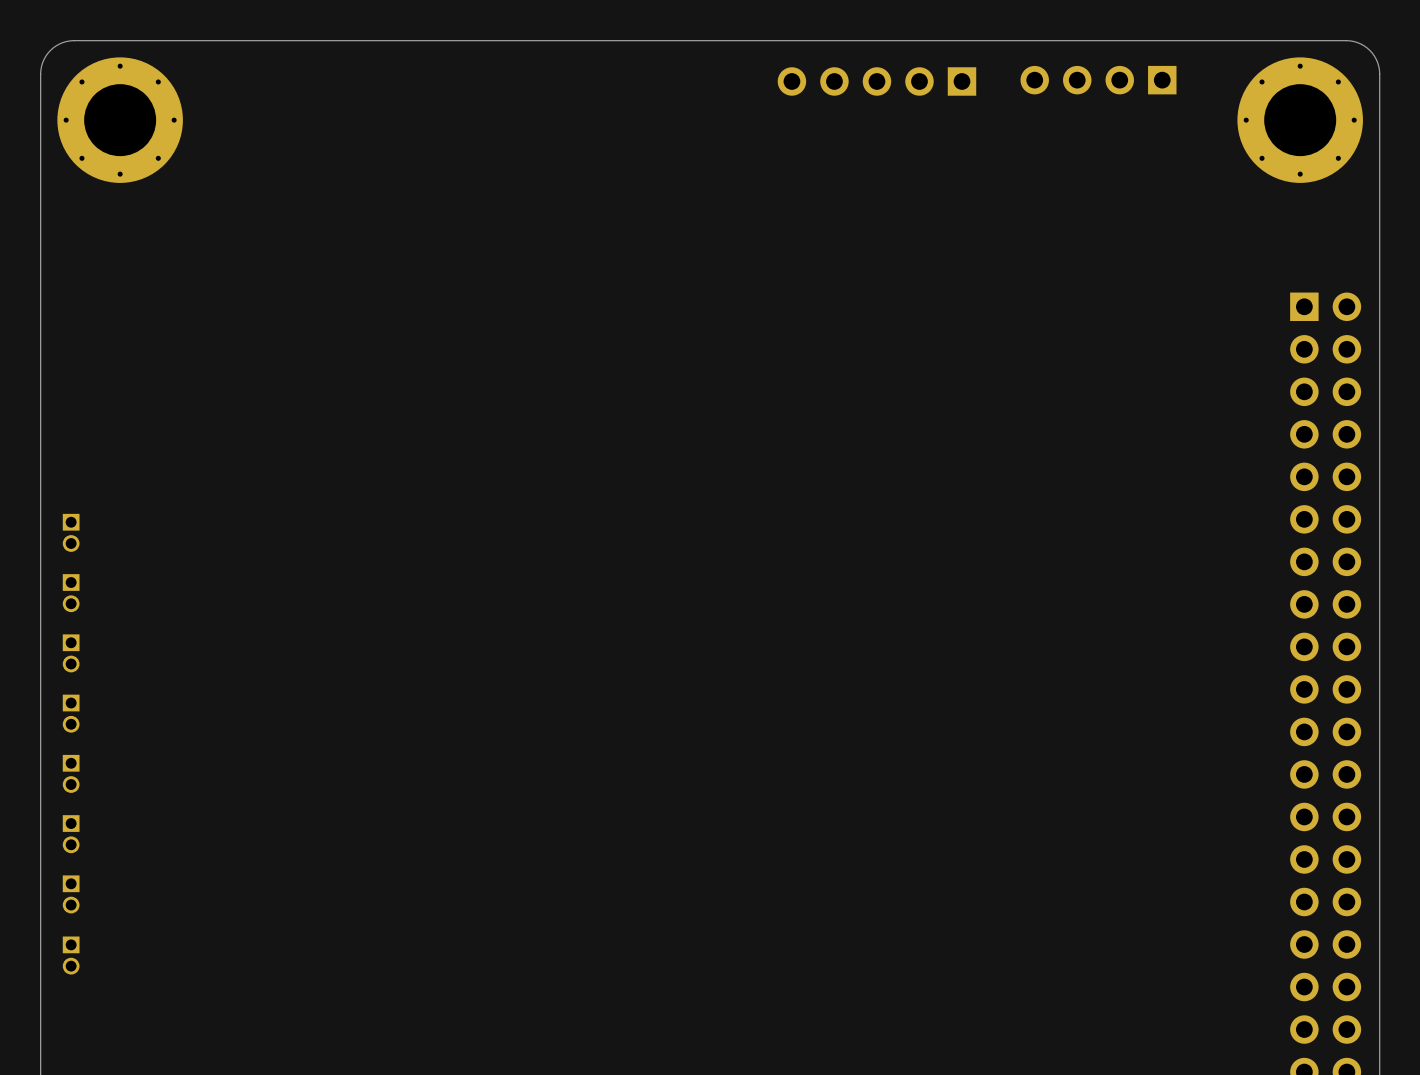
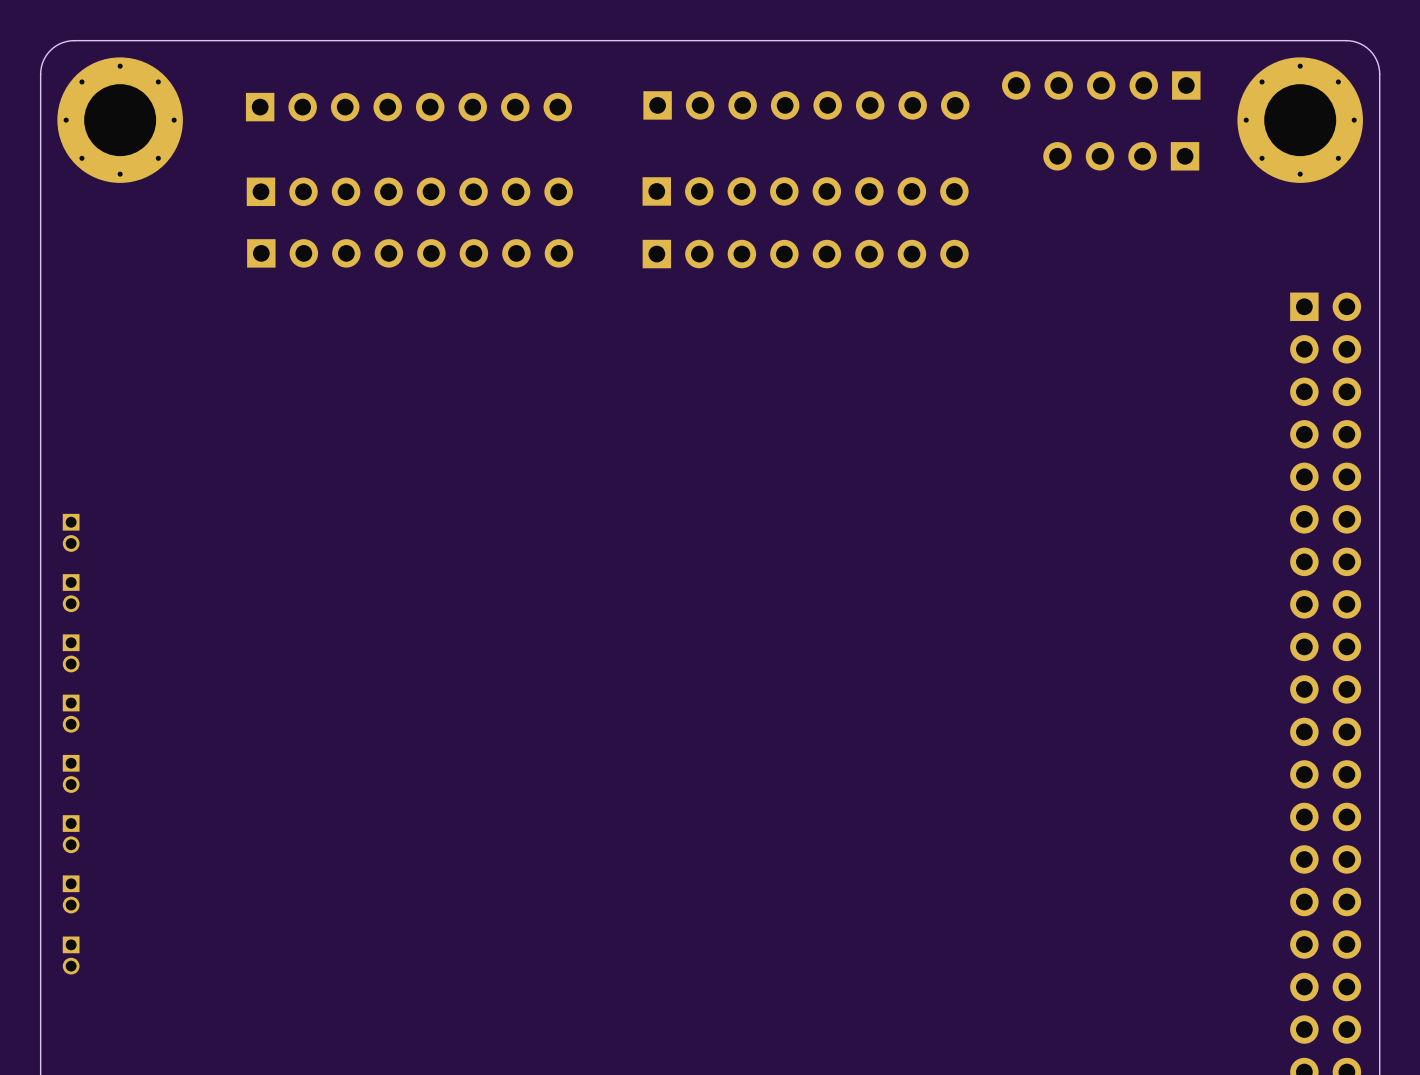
part footprint: [1020, 65, 1177, 95] -> [1002, 71, 1201, 100]
part: (876, 81) -> none
part: none -> (806, 105)
part: none -> (408, 107)
part: none -> (1121, 156)
part: none -> (409, 191)
part: none -> (805, 191)
part: none -> (410, 253)
part: none -> (805, 254)

